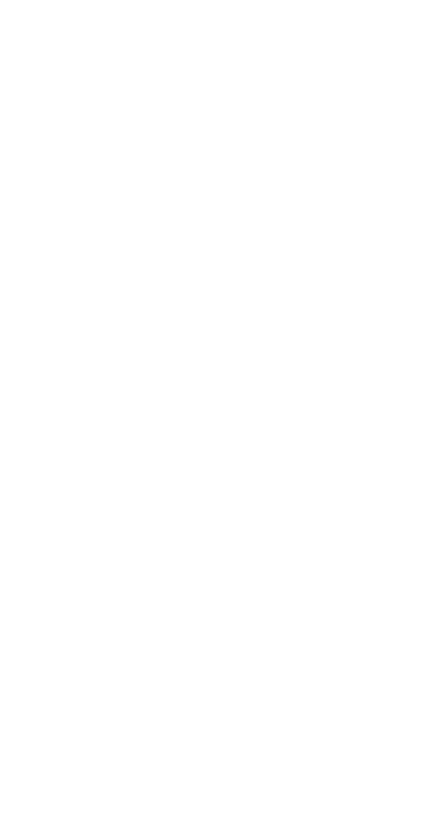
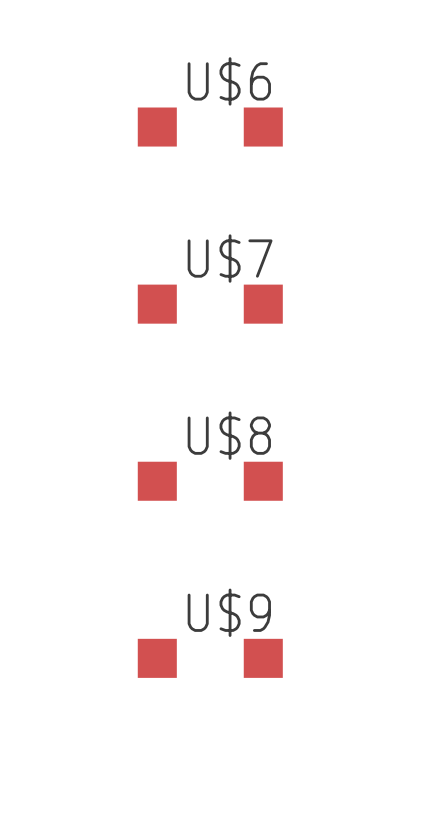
U$6: none -> (210, 127)
U$7: none -> (210, 304)
U$8: none -> (210, 481)
U$9: none -> (210, 658)

